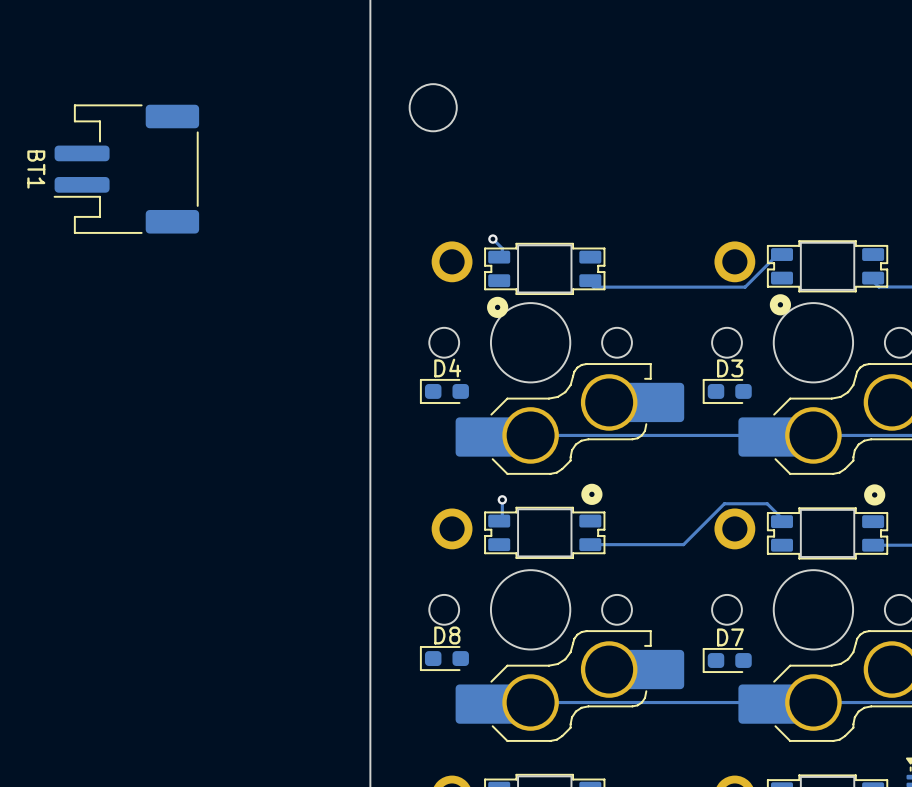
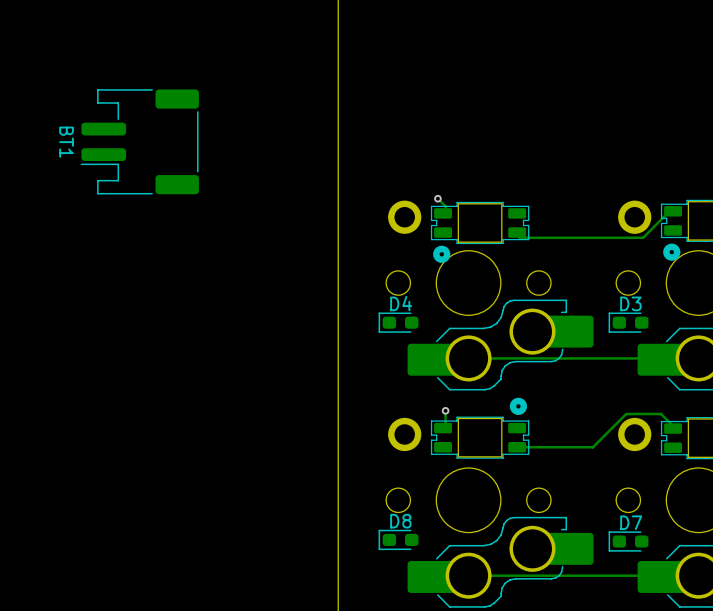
round board edge: [409, 83, 458, 132] -> none

